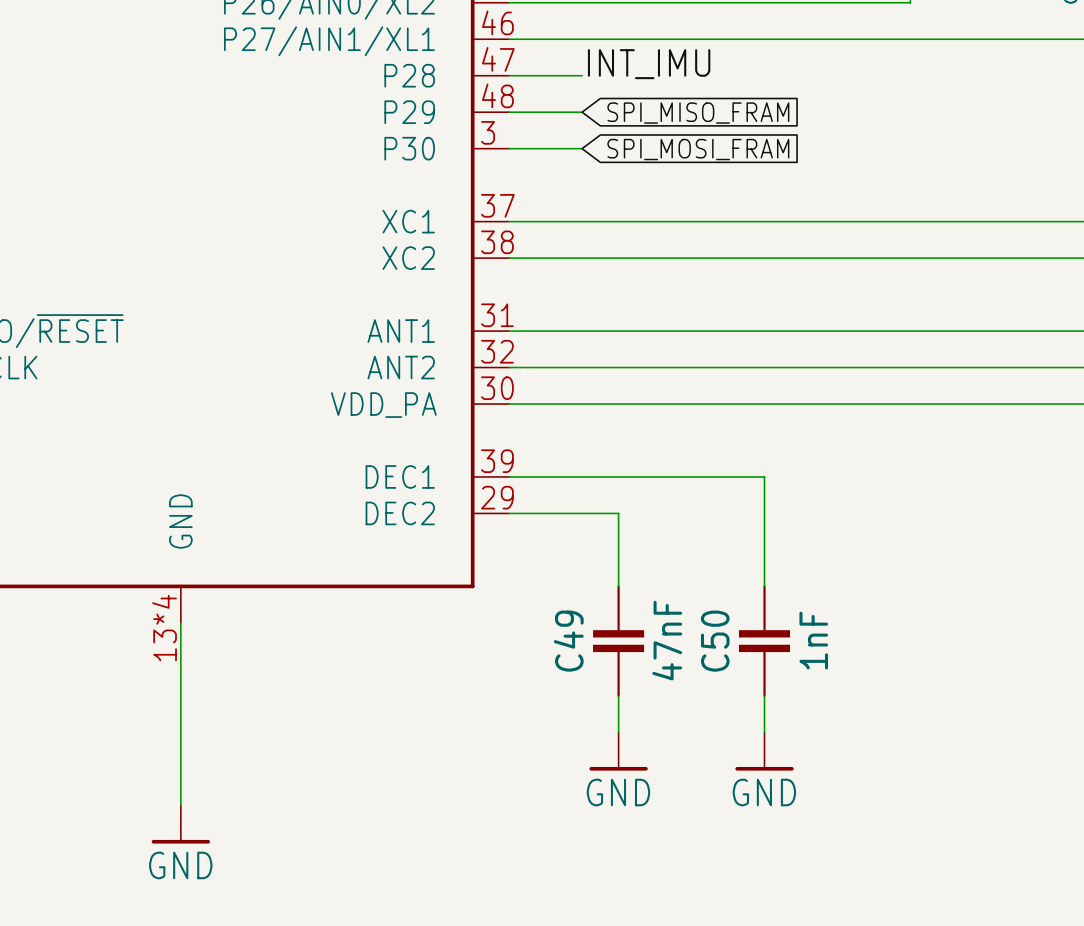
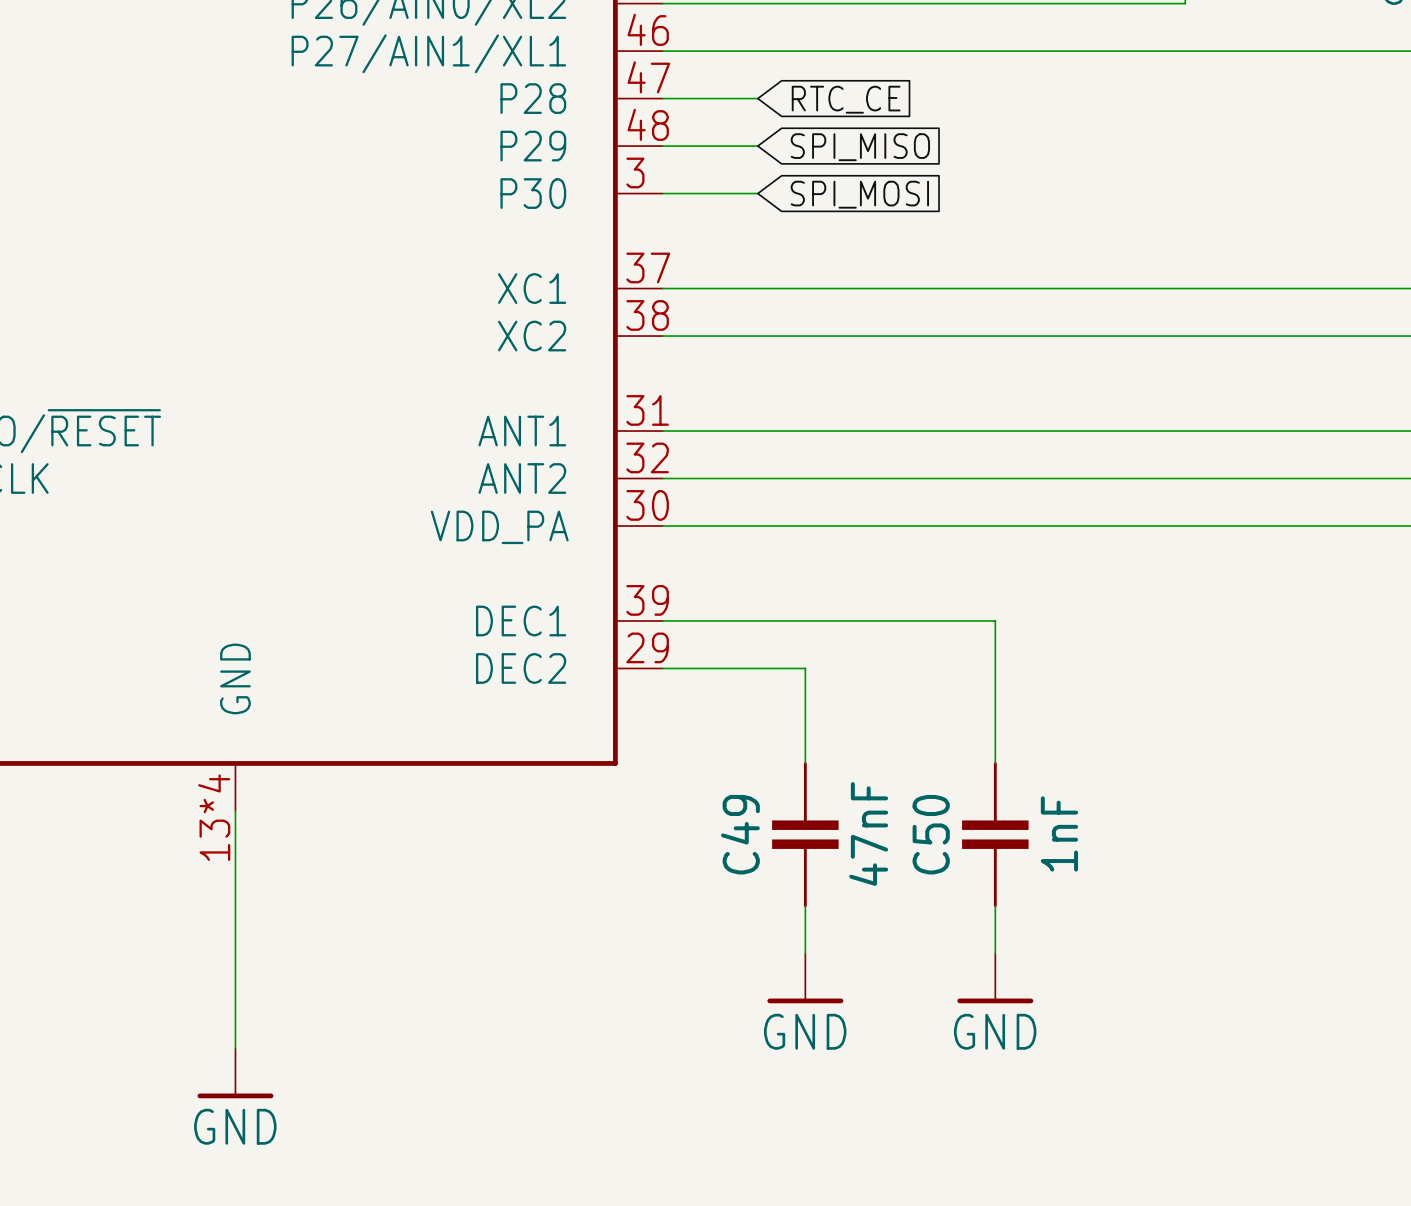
label: INT_IMU (649, 64) -> none
global label: none -> RTC_CE (846, 99)
global label: SPI_MISO_FRAM (698, 113) -> SPI_MISO (860, 147)
global label: SPI_MOSI_FRAM (698, 149) -> SPI_MOSI (859, 194)

